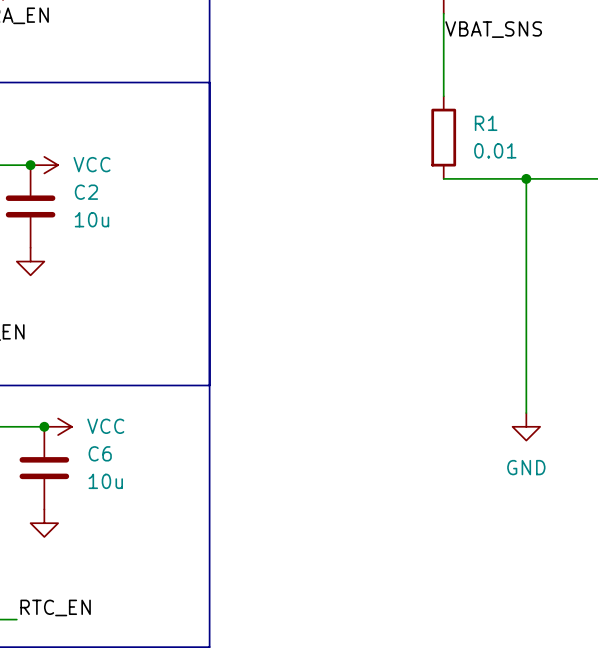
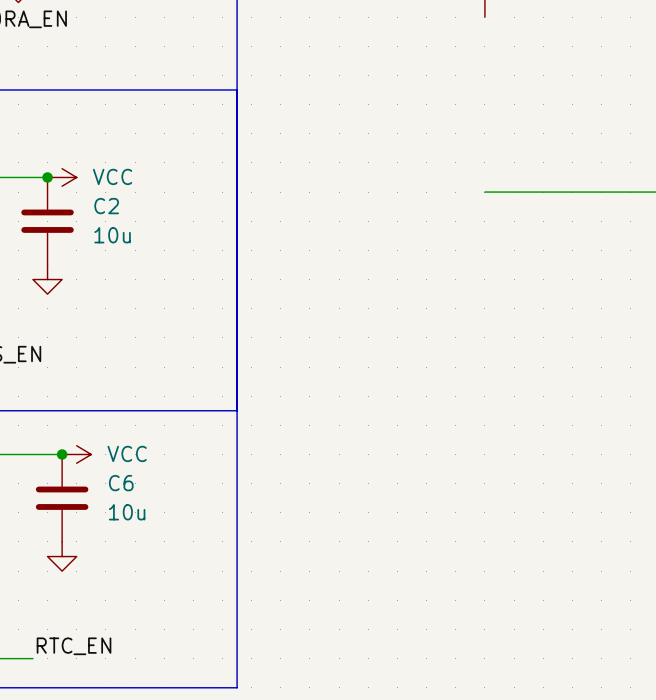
wire: (443, 13) (443, 96) -> none
label: VBAT_SNS (493, 29) -> none
R1: 0.01 (443, 137) -> none
wire: (526, 178) (526, 413) -> none
junction: (526, 178) -> none
power symbol: GND (526, 426) -> none

